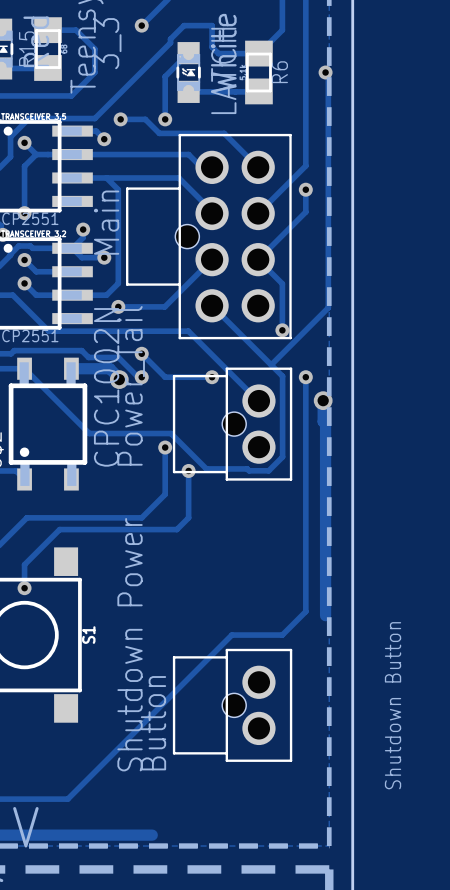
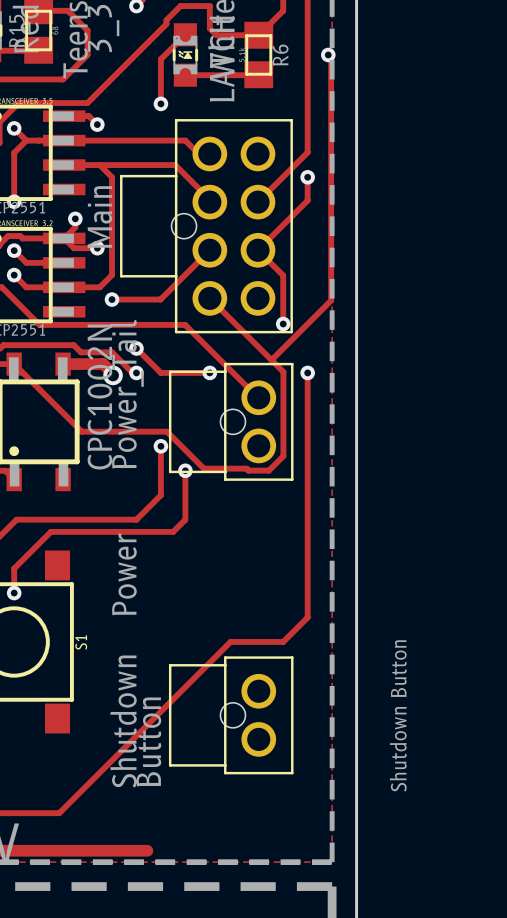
track: (120, 119) (145, 119) (159, 133) (224, 133) (258, 167) -> none
via: (120, 119) -> none
track: (323, 400) (323, 421) (325, 424) (325, 615) -> none
via: (323, 400) -> none

